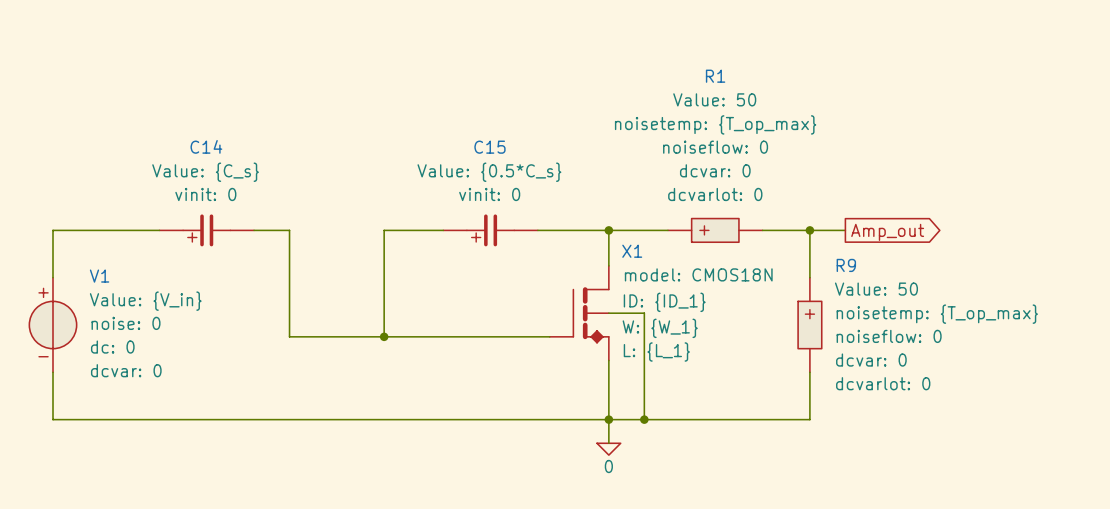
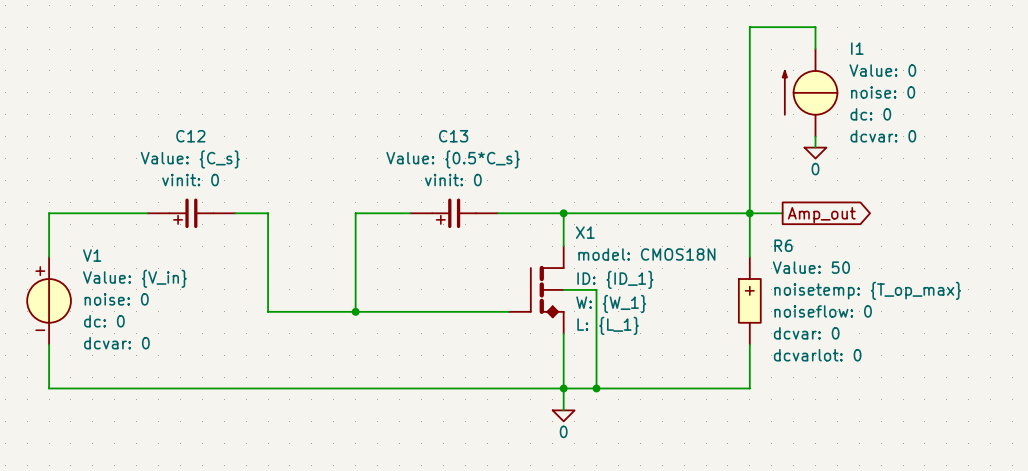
wire: none -> (815, 49) (815, 27) (749, 27) (749, 213)
I1: none -> Value: 0 (810, 92)
C14 name: C14 (206, 146) -> C12 (190, 136)
C15 name: C15 (489, 147) -> C13 (453, 136)
wire: none -> (815, 136) (815, 147)
power symbol: none -> 0 (815, 153)
R1: Value: 50 (715, 230) -> none
R9 name: R9 (846, 265) -> R6 (783, 245)

